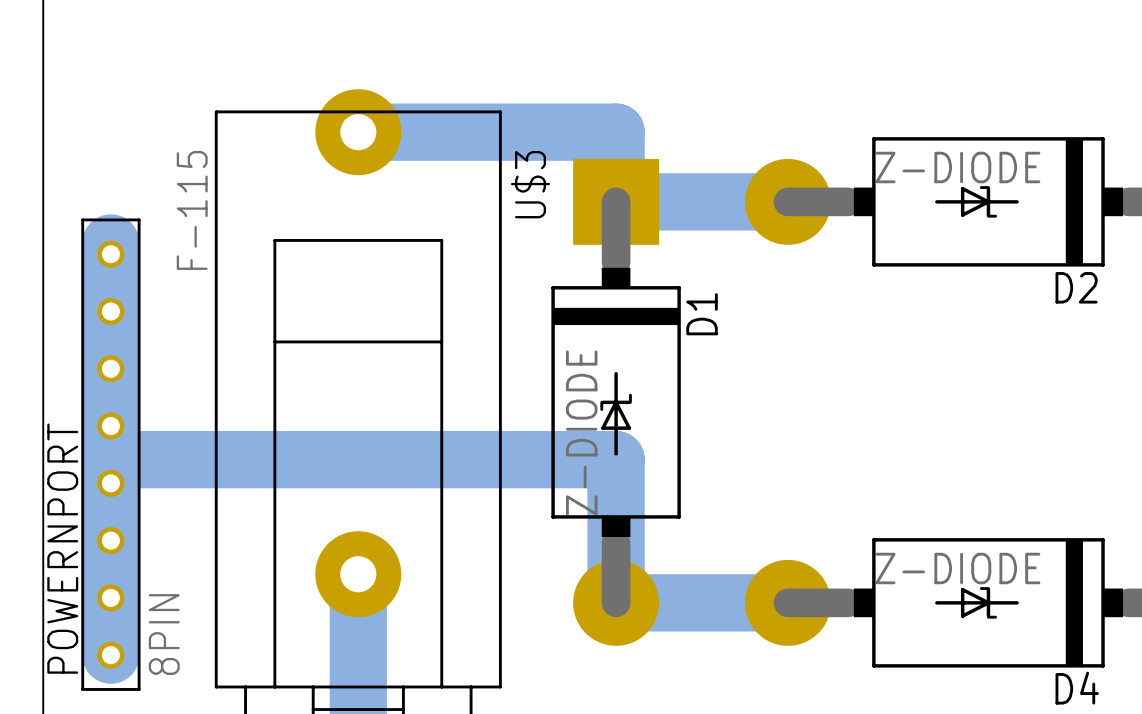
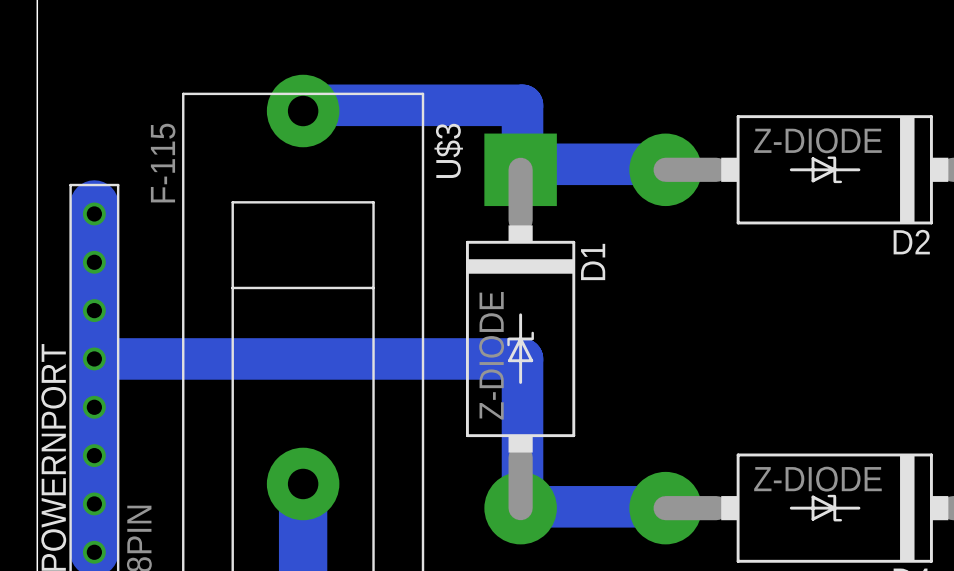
bottom track: none -> (303, 99) (303, 105) (522, 105) (522, 166)
bottom track: (358, 132) (616, 132) (616, 201) (787, 201) -> none
bottom track: none -> (522, 164) (657, 164)
bottom track: none -> (94, 358) (522, 358) (522, 506) (657, 506)
bottom track: (110, 459) (616, 459) (616, 602) (787, 602) -> none

